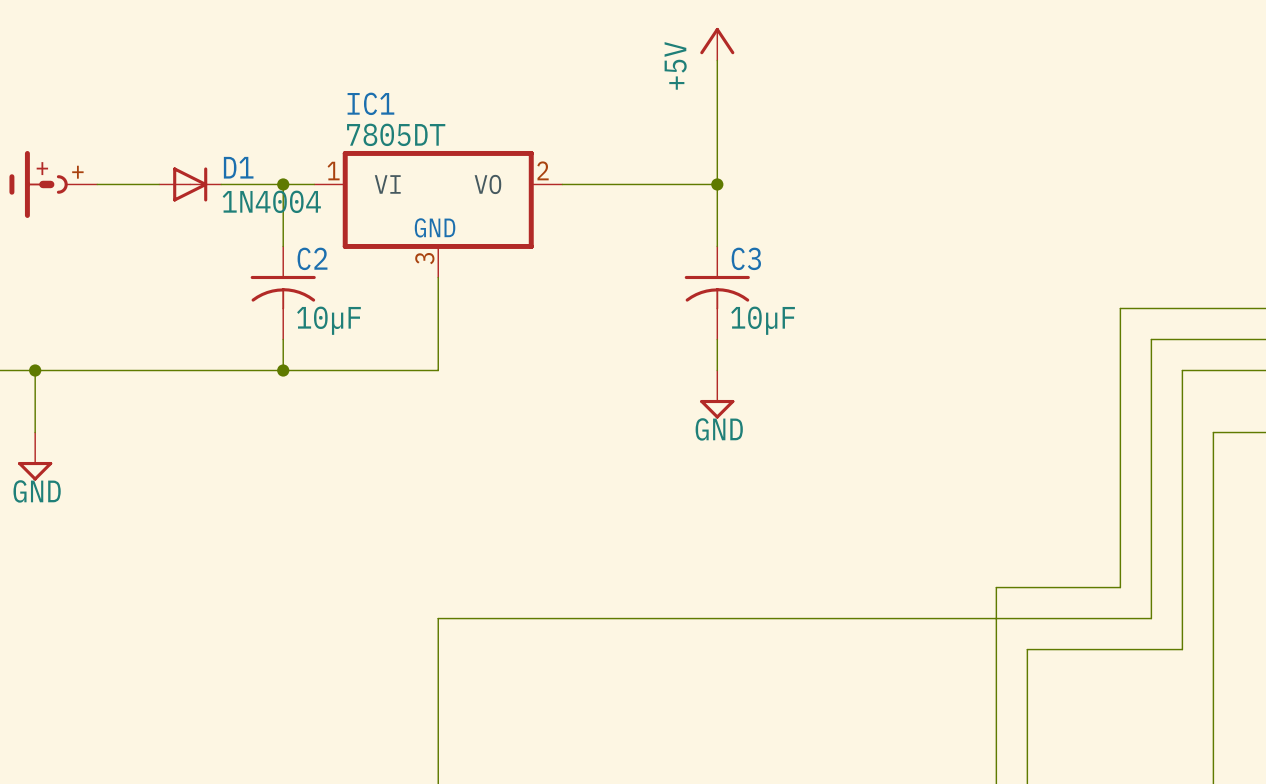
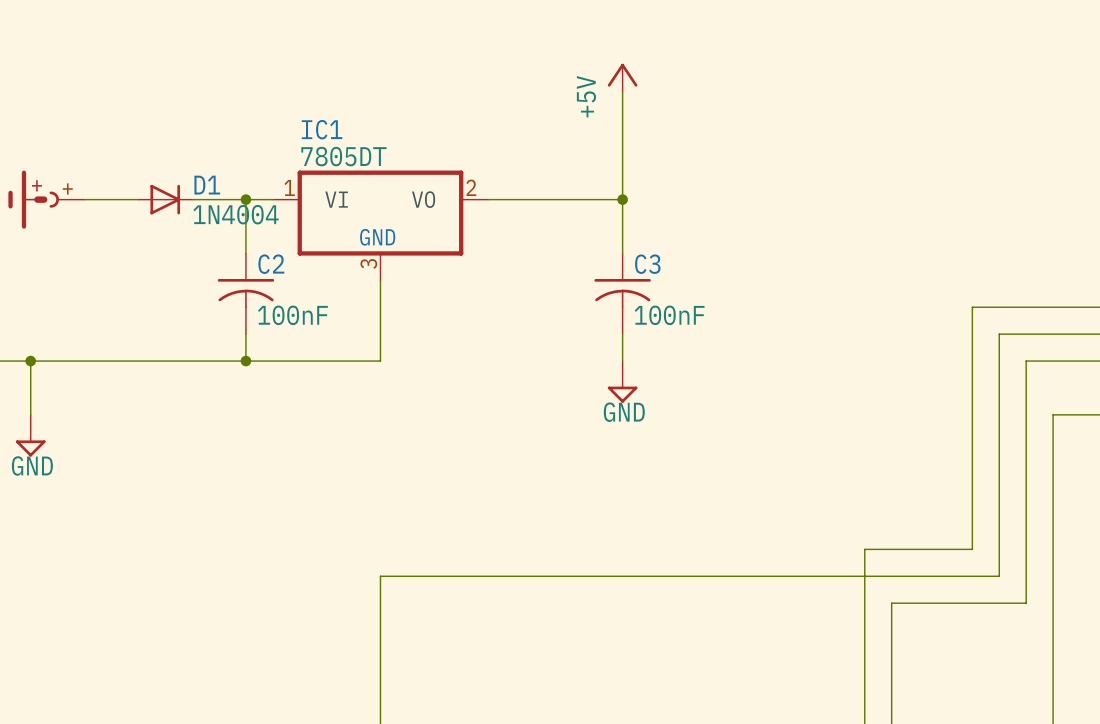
C2 value: 10µF (328, 320) -> 100nF (292, 315)
C3 value: 10µF (763, 320) -> 100nF (669, 315)

